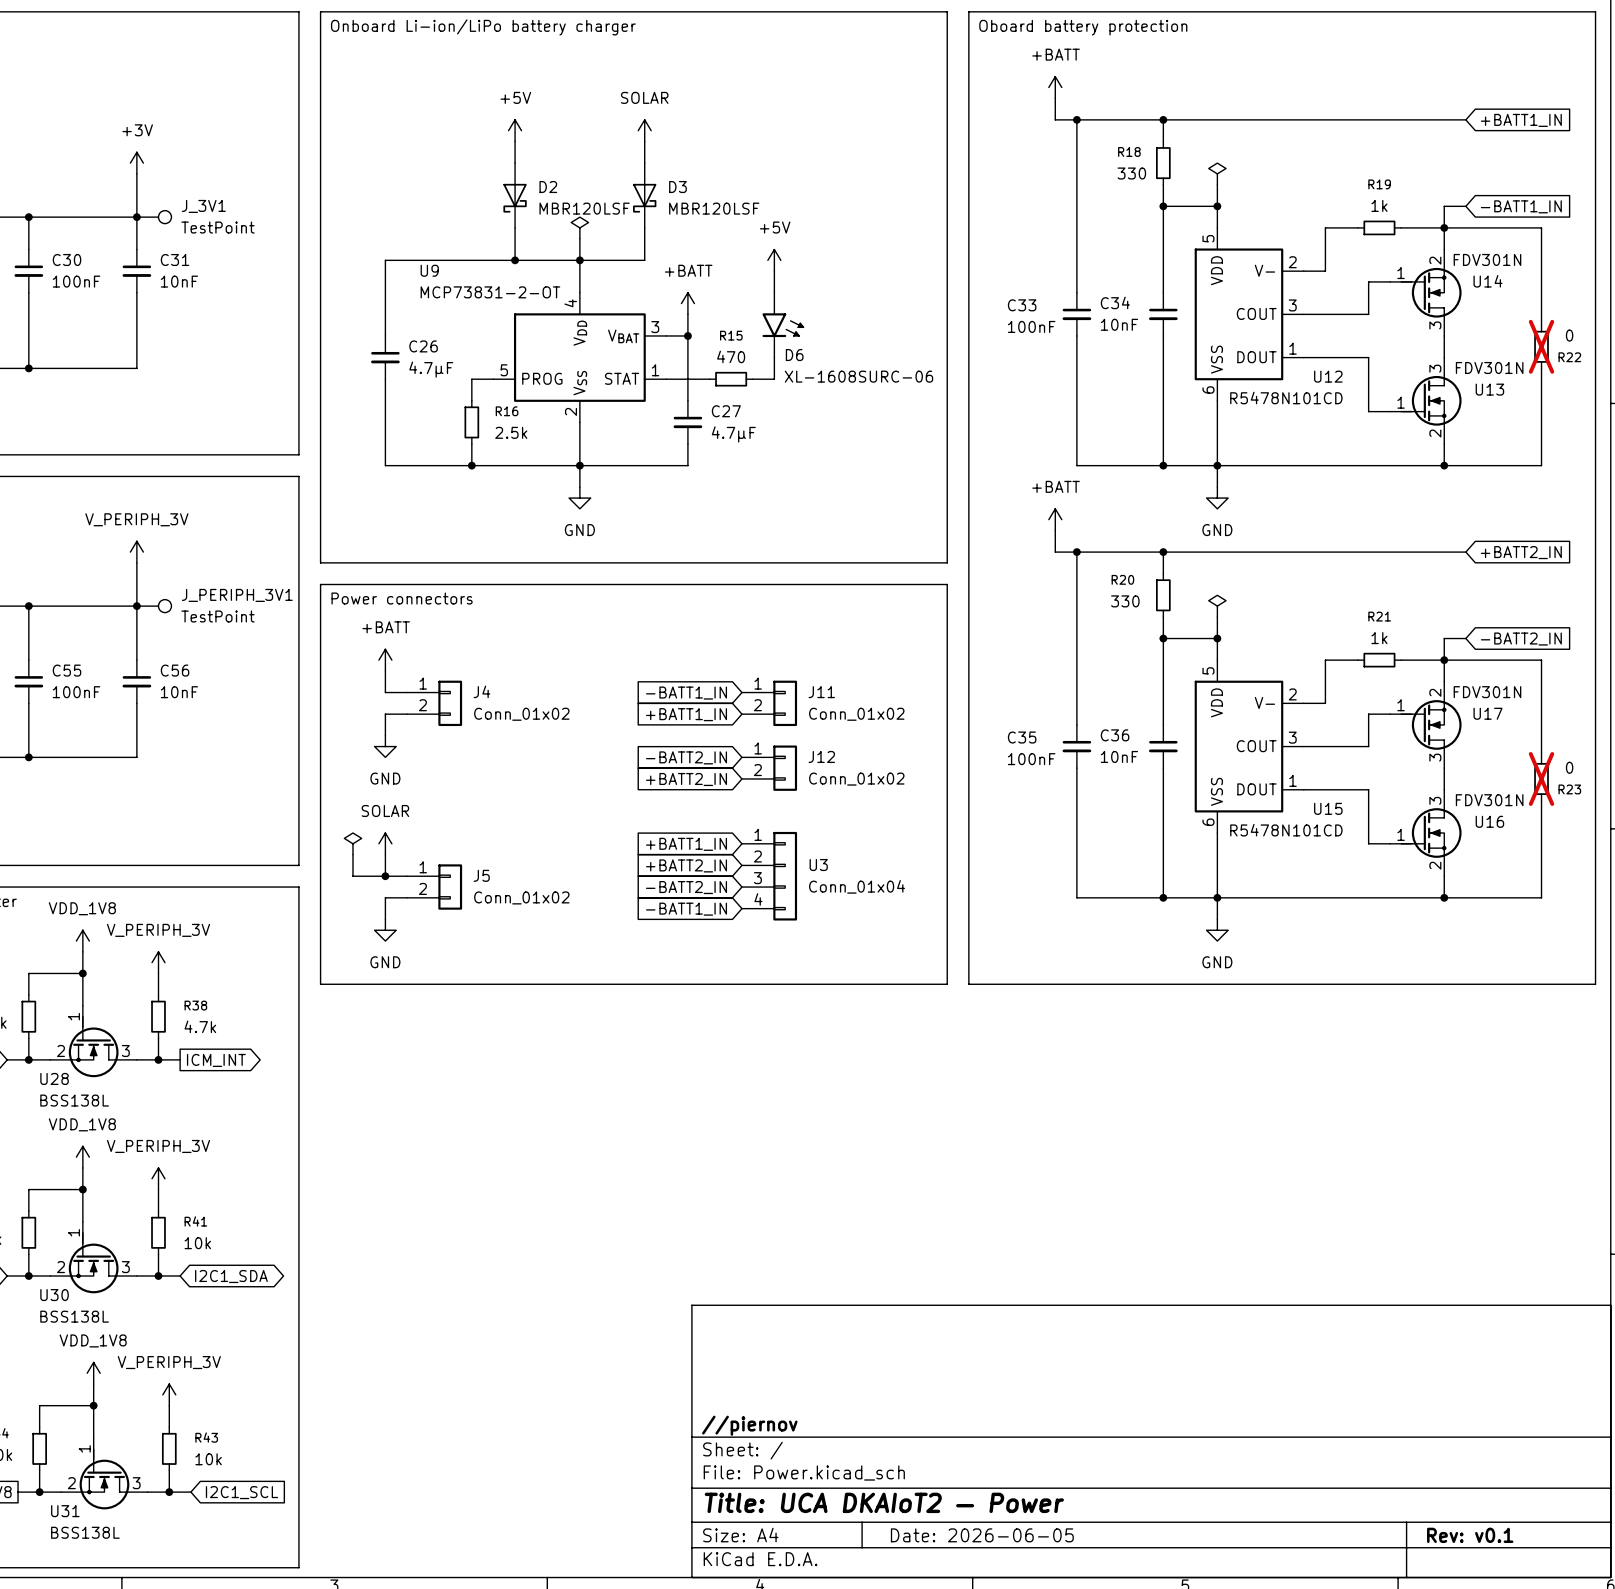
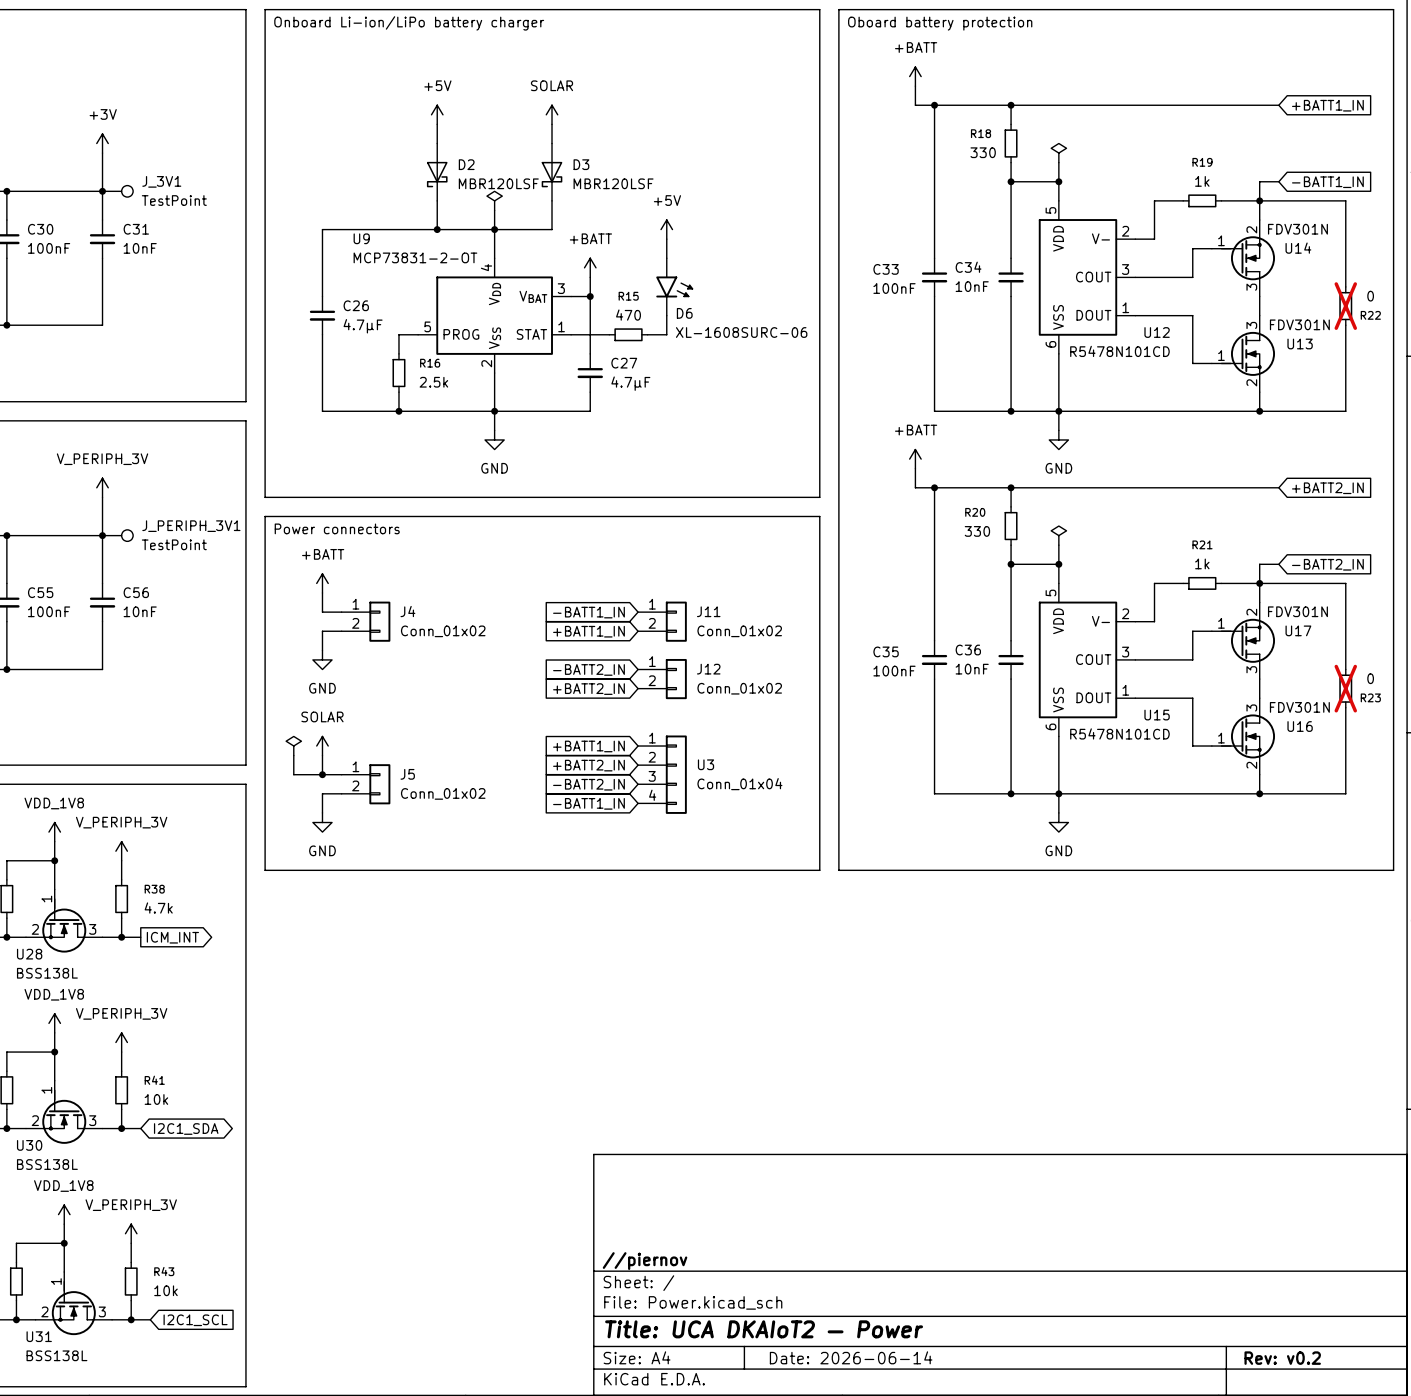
title block: Date: 2026-06-05 (982, 1535) -> Date: 2026-06-14 (851, 1357)
title block: Rev: v0.1 (1470, 1535) -> Rev: v0.2 (1282, 1358)

